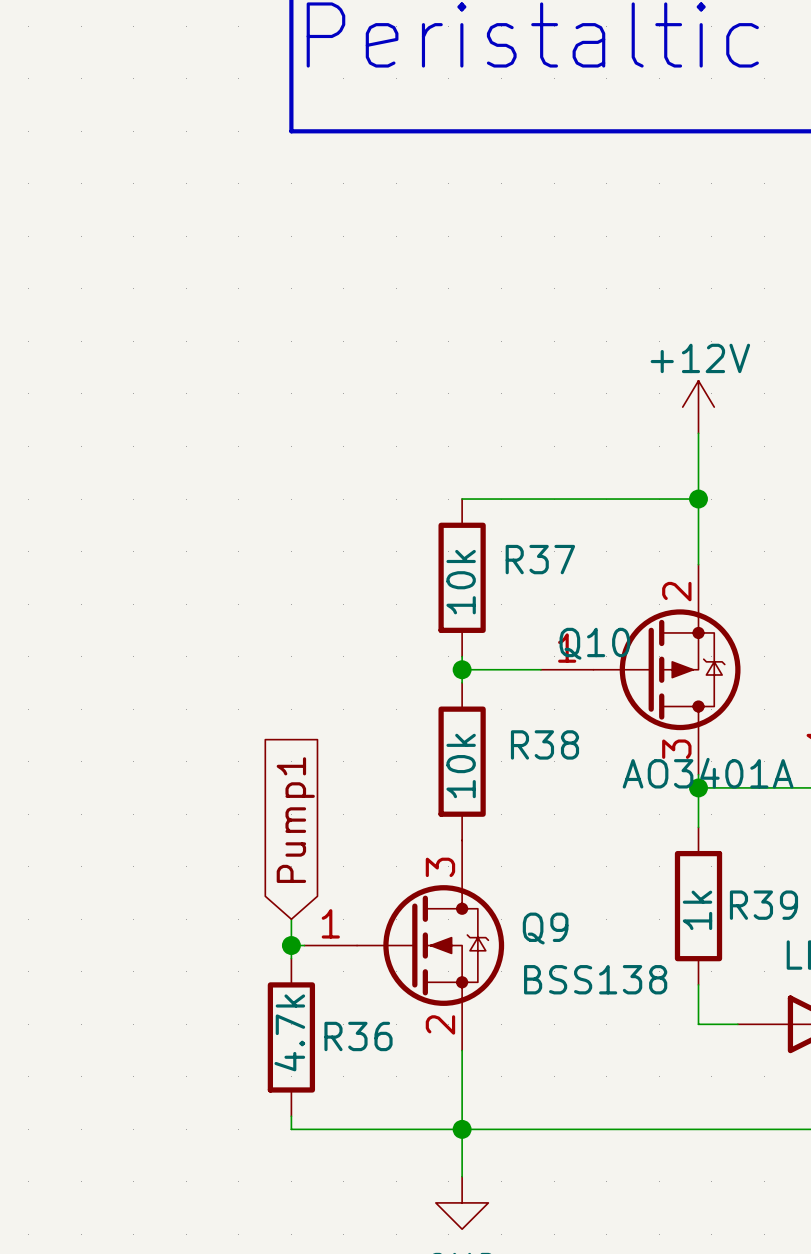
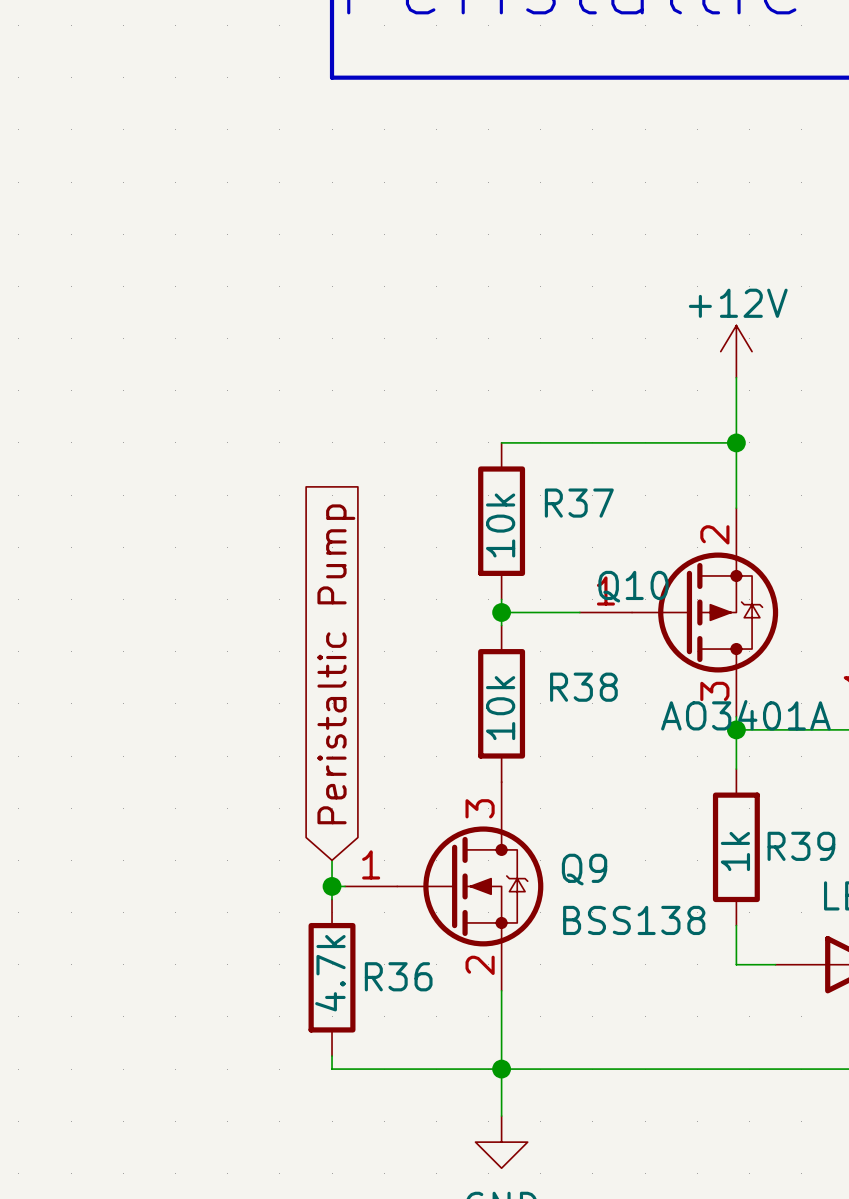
global label: Pump1 (295, 820) -> Peristaltic Pump (336, 664)

